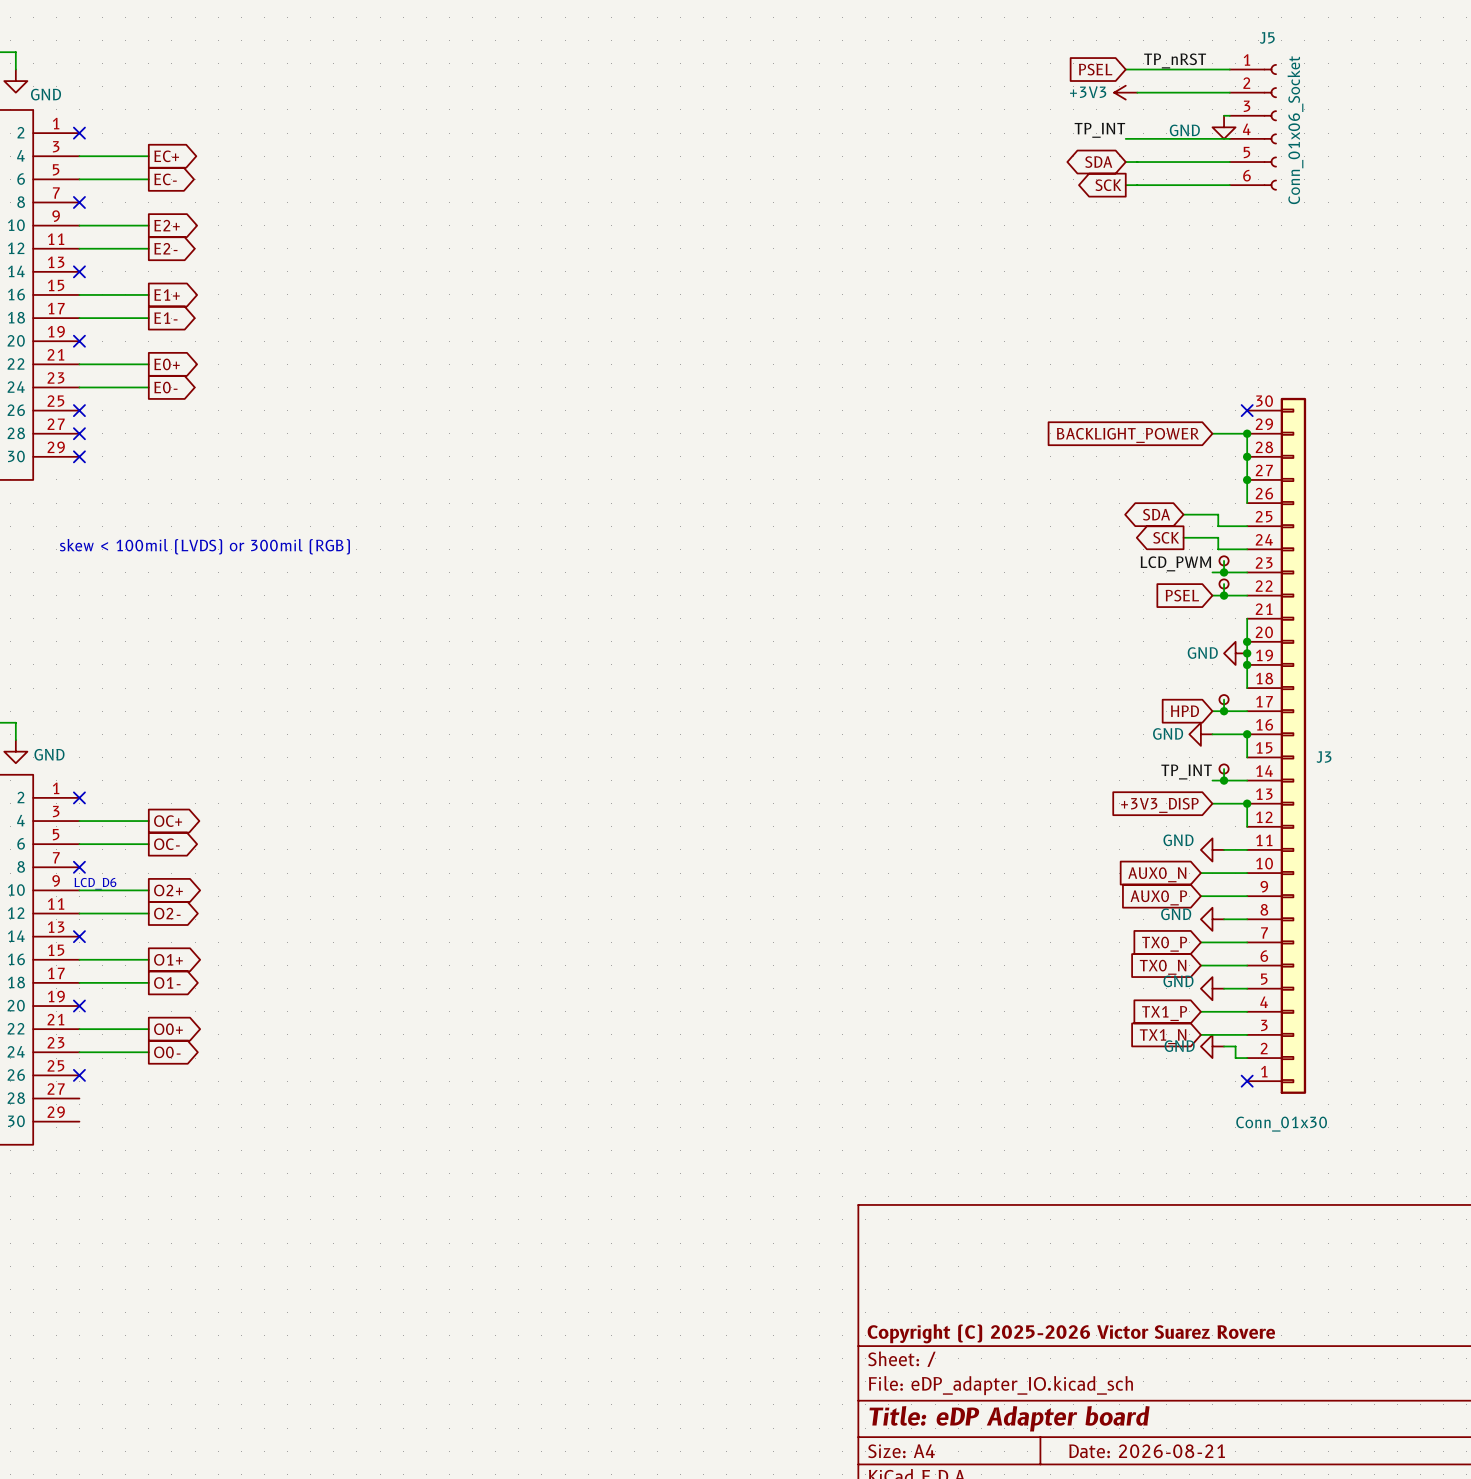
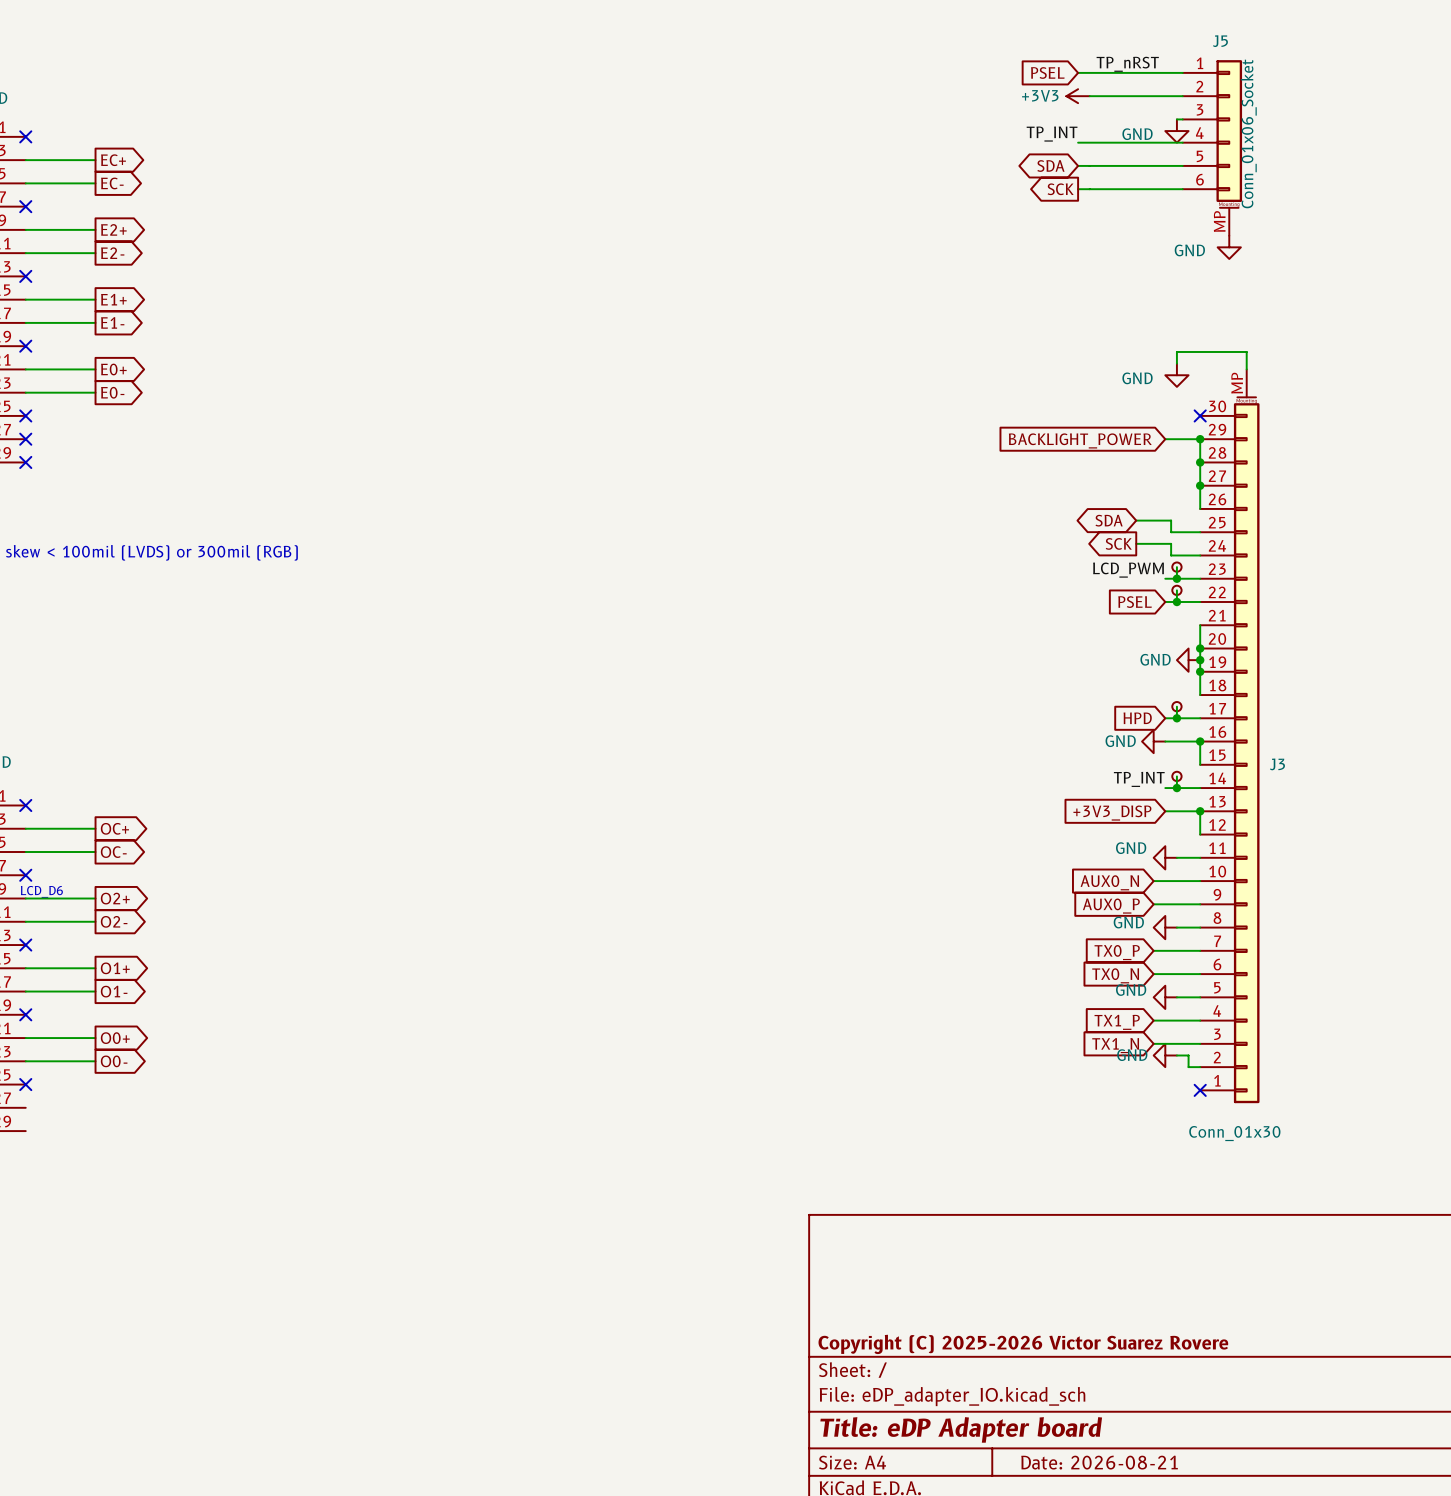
J5 symbol: [1229, 64, 1277, 191] -> [1182, 60, 1243, 236]
power symbol: none -> GND (1229, 247)
wire: none -> (1176, 363) (1176, 351) (1246, 351) (1246, 369)
power symbol: none -> GND (1176, 375)
J3 symbol: [1247, 397, 1307, 1094] -> [1200, 369, 1260, 1104]

